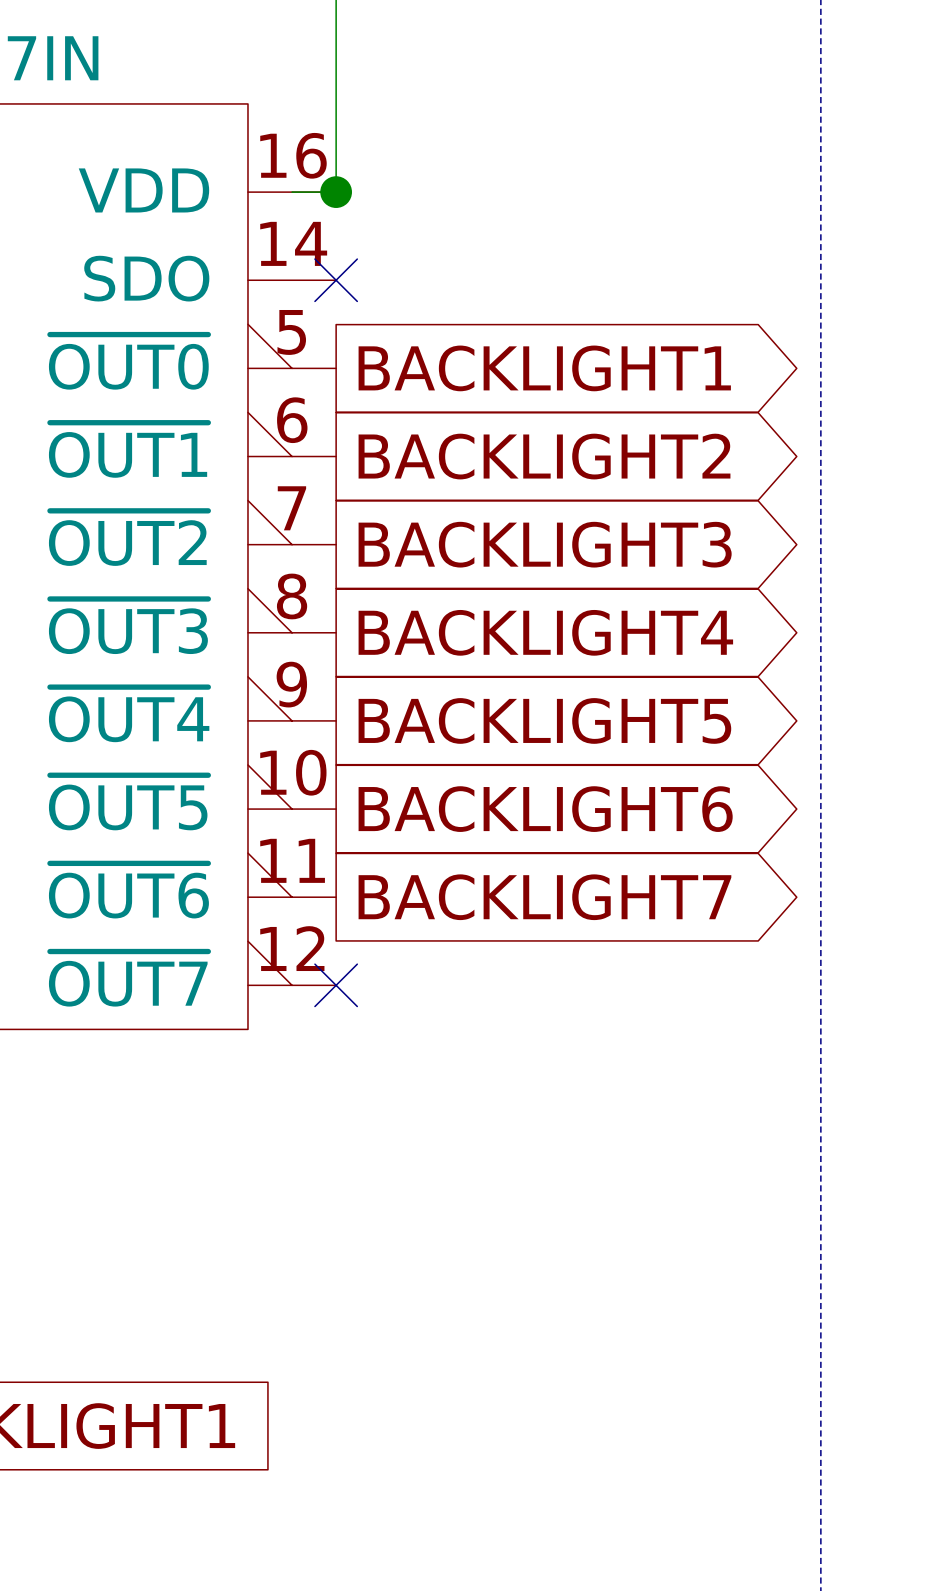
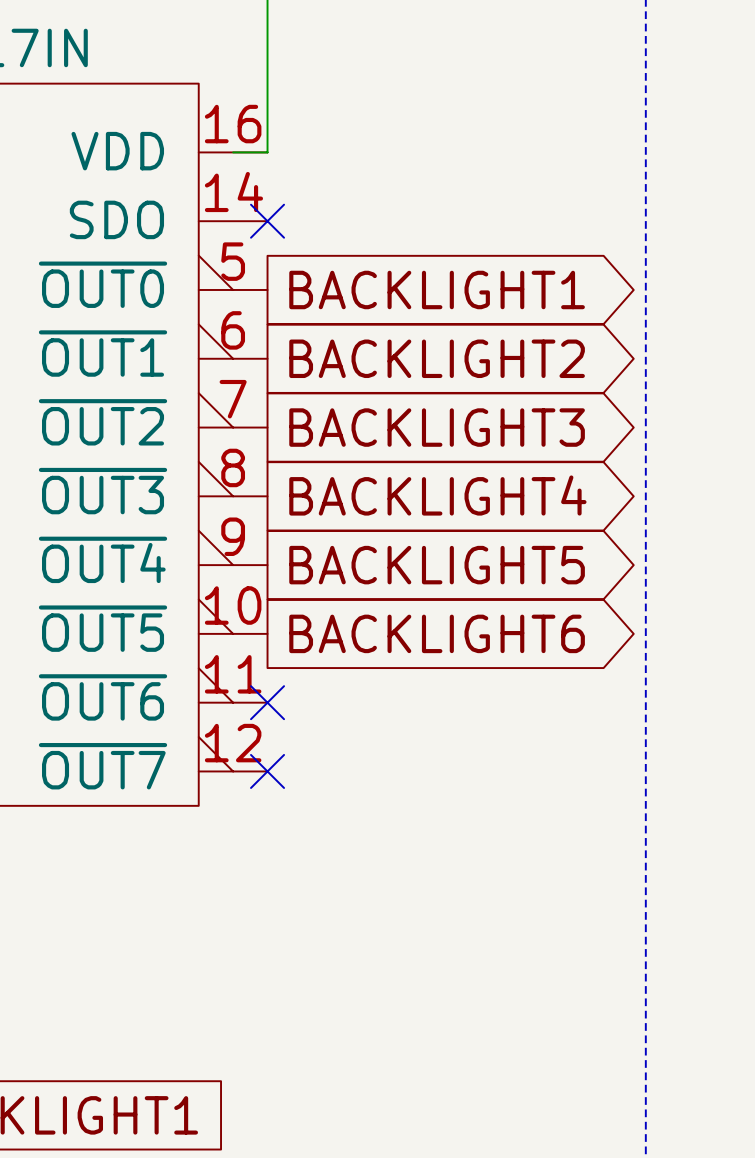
junction: (336, 192) -> none
no-connect mark: none -> (267, 702)
global label: BACKLIGHT7 (544, 897) -> none

